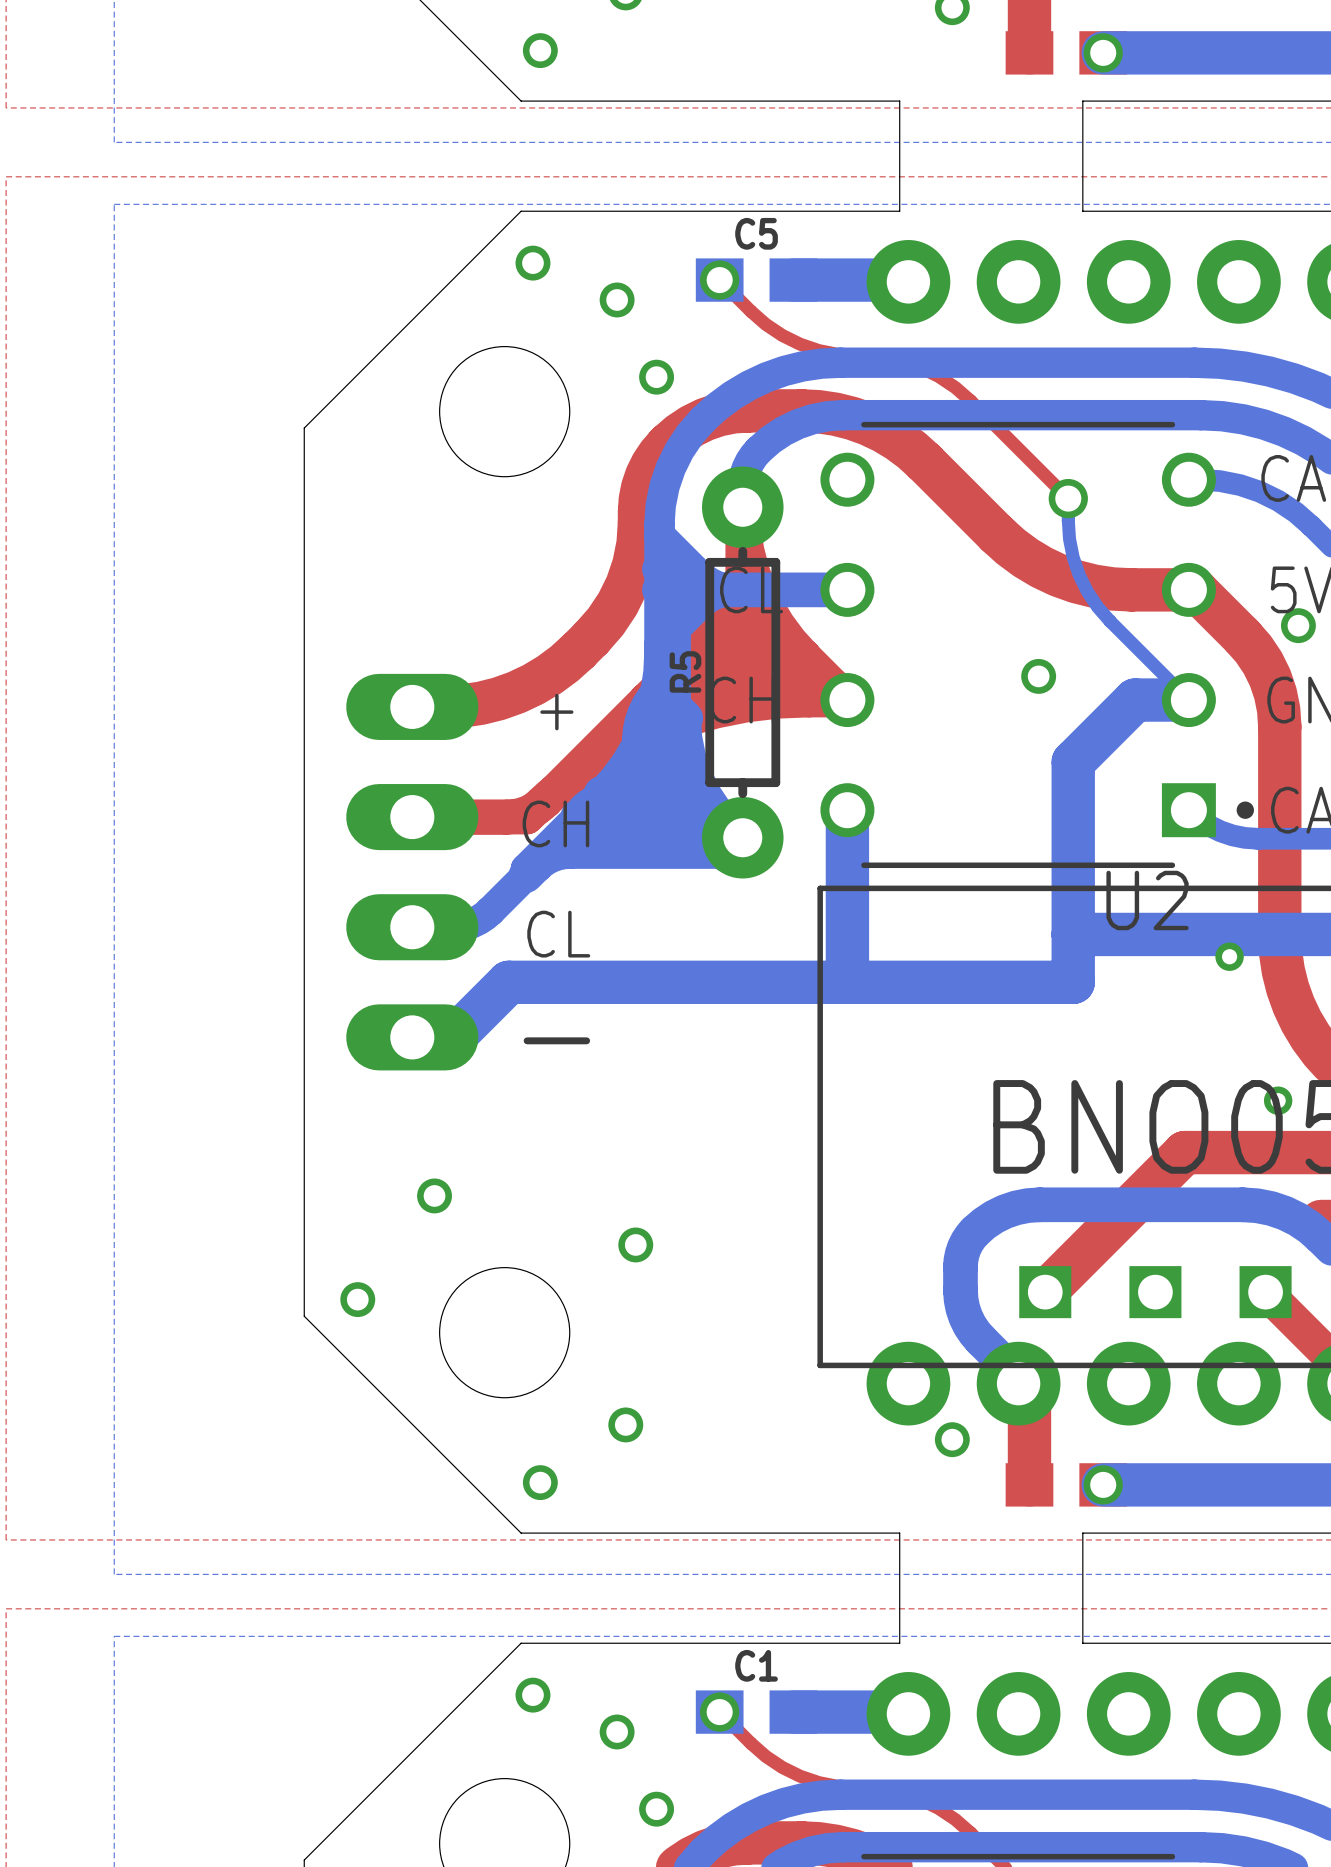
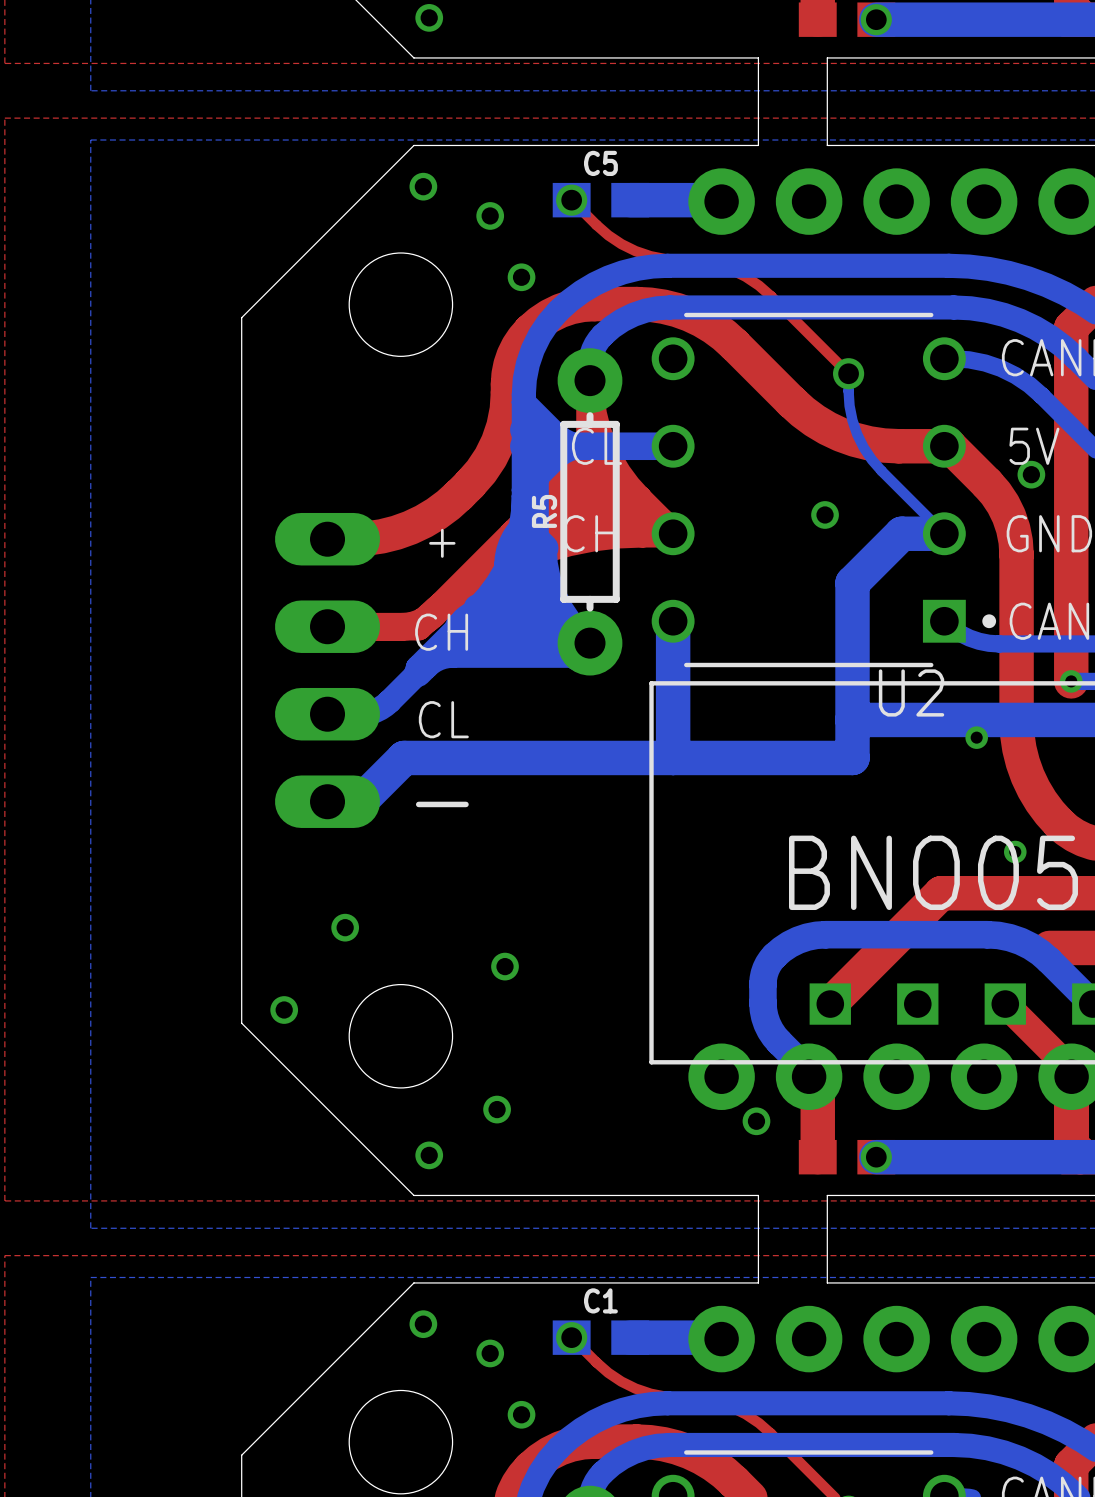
board edge: (899, 101) (899, 211) -> (714, 57) (758, 57) (758, 145) (714, 145)
board edge: (1082, 101) (1082, 211) -> (860, 57) (827, 57) (827, 145) (860, 145)
board edge: (899, 1533) (899, 1643) -> (714, 1195) (758, 1195) (758, 1282) (714, 1282)
board edge: (1082, 1533) (1082, 1643) -> (860, 1195) (827, 1195) (827, 1282) (860, 1282)

